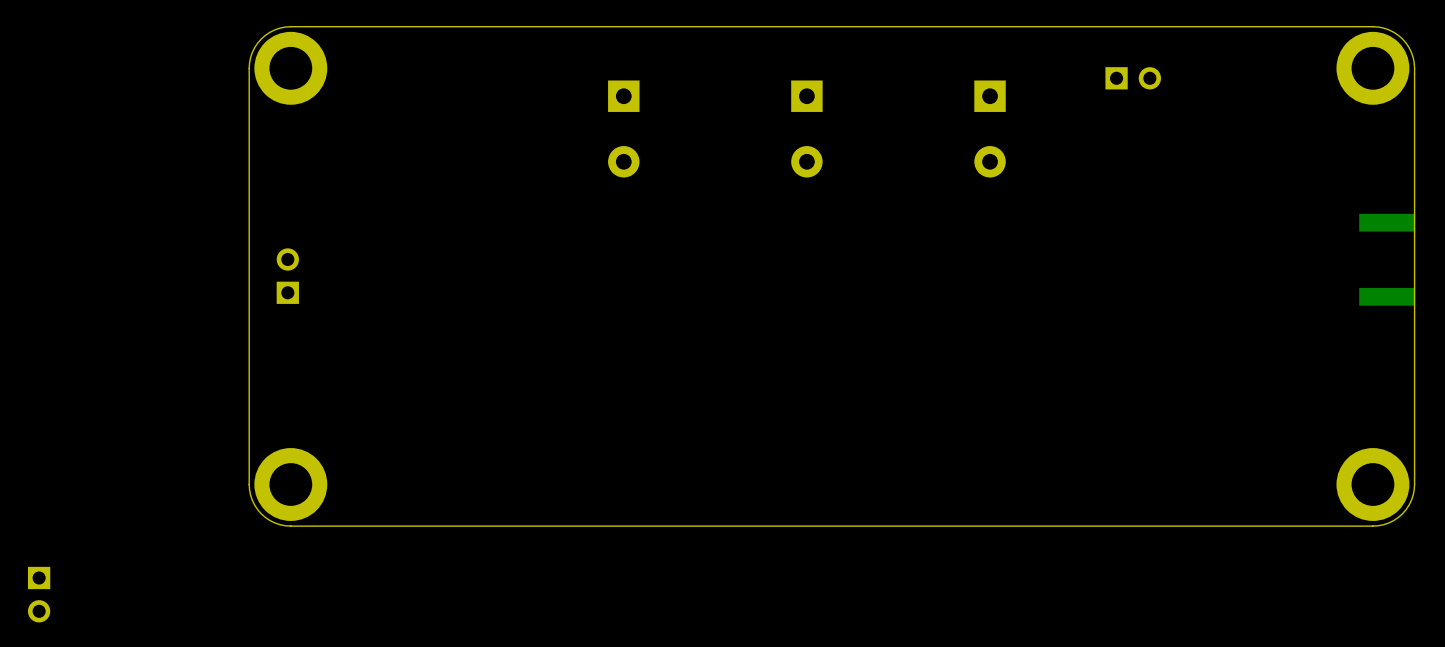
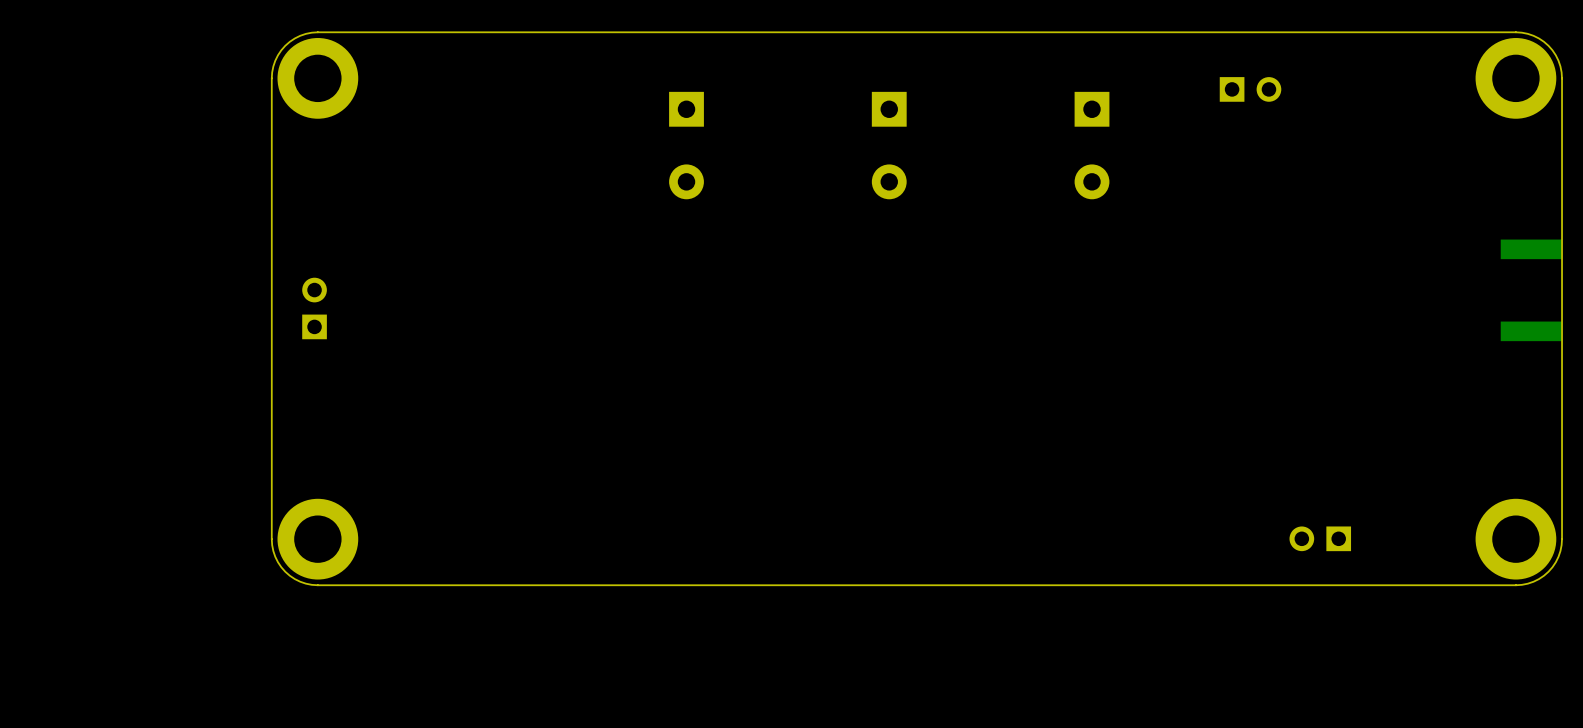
part: none -> (1320, 538)
part: (39, 594) -> none

